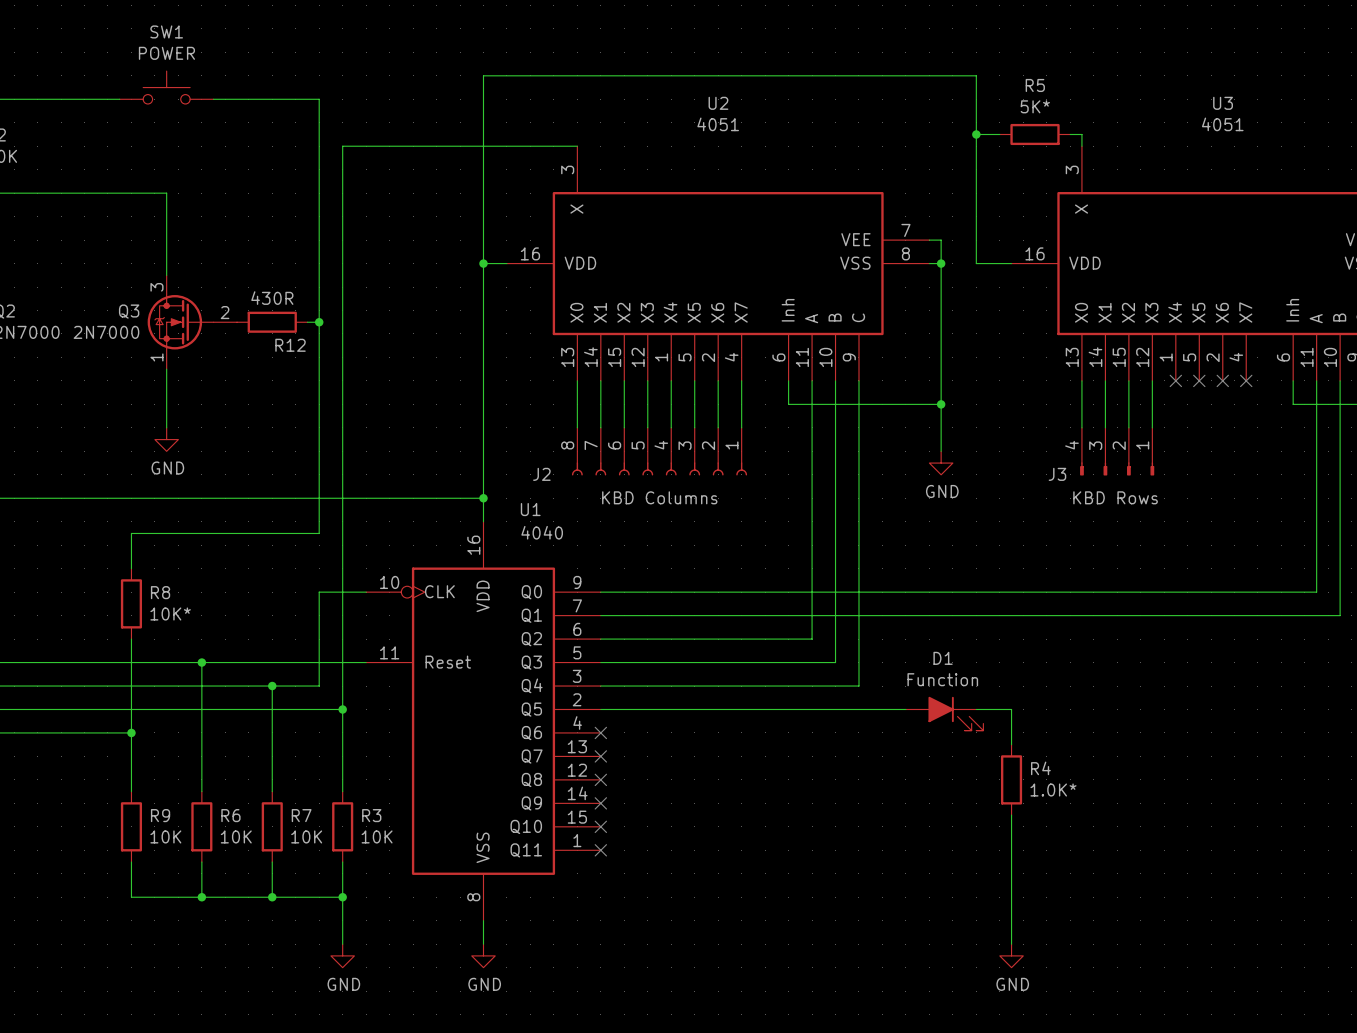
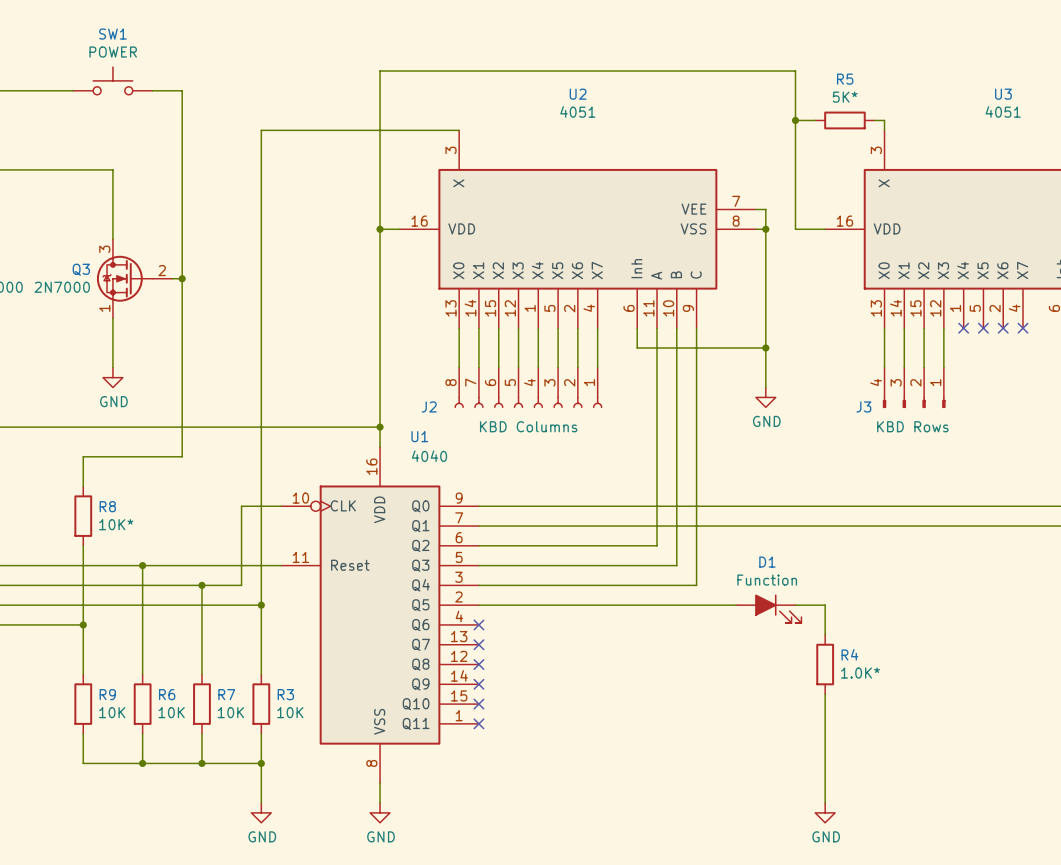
wire: (248, 99) (319, 99) (319, 533) (248, 533) -> (182, 90) (182, 456)
junction: none -> (182, 278)
R12: 430R (272, 322) -> none
junction: (319, 322) -> none

